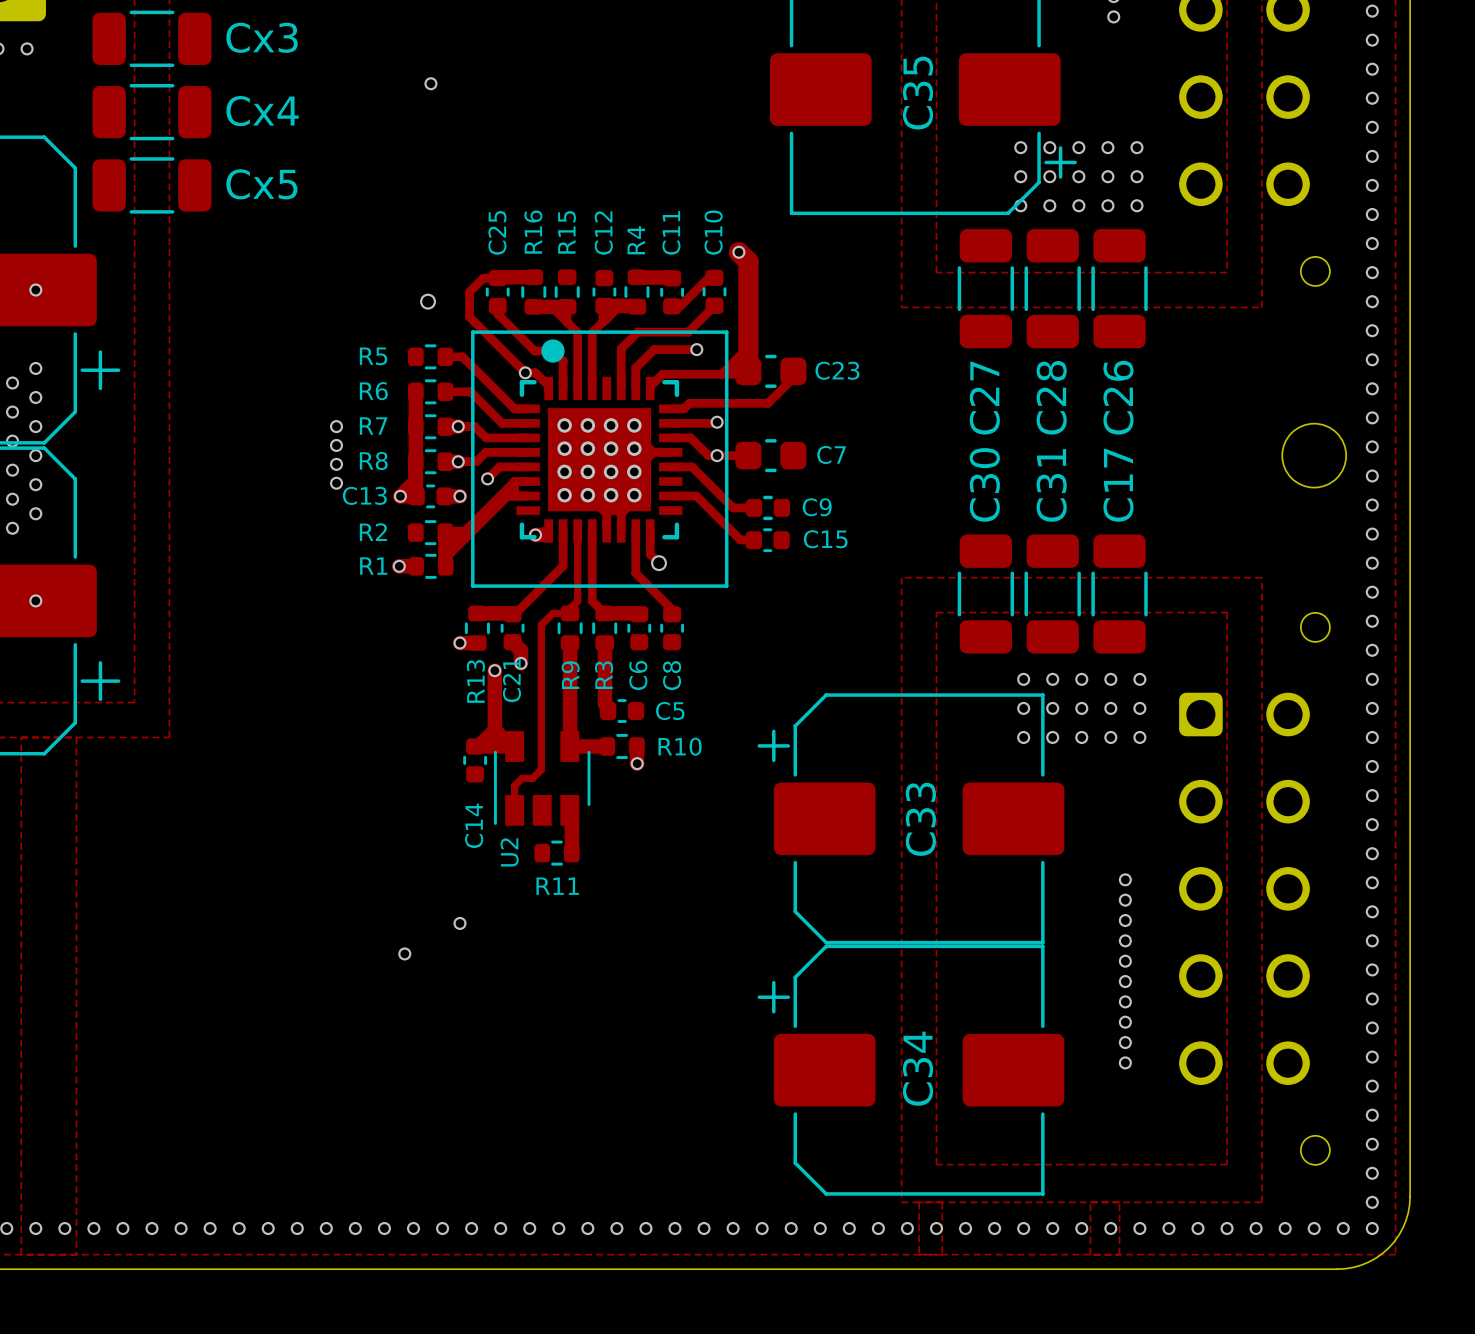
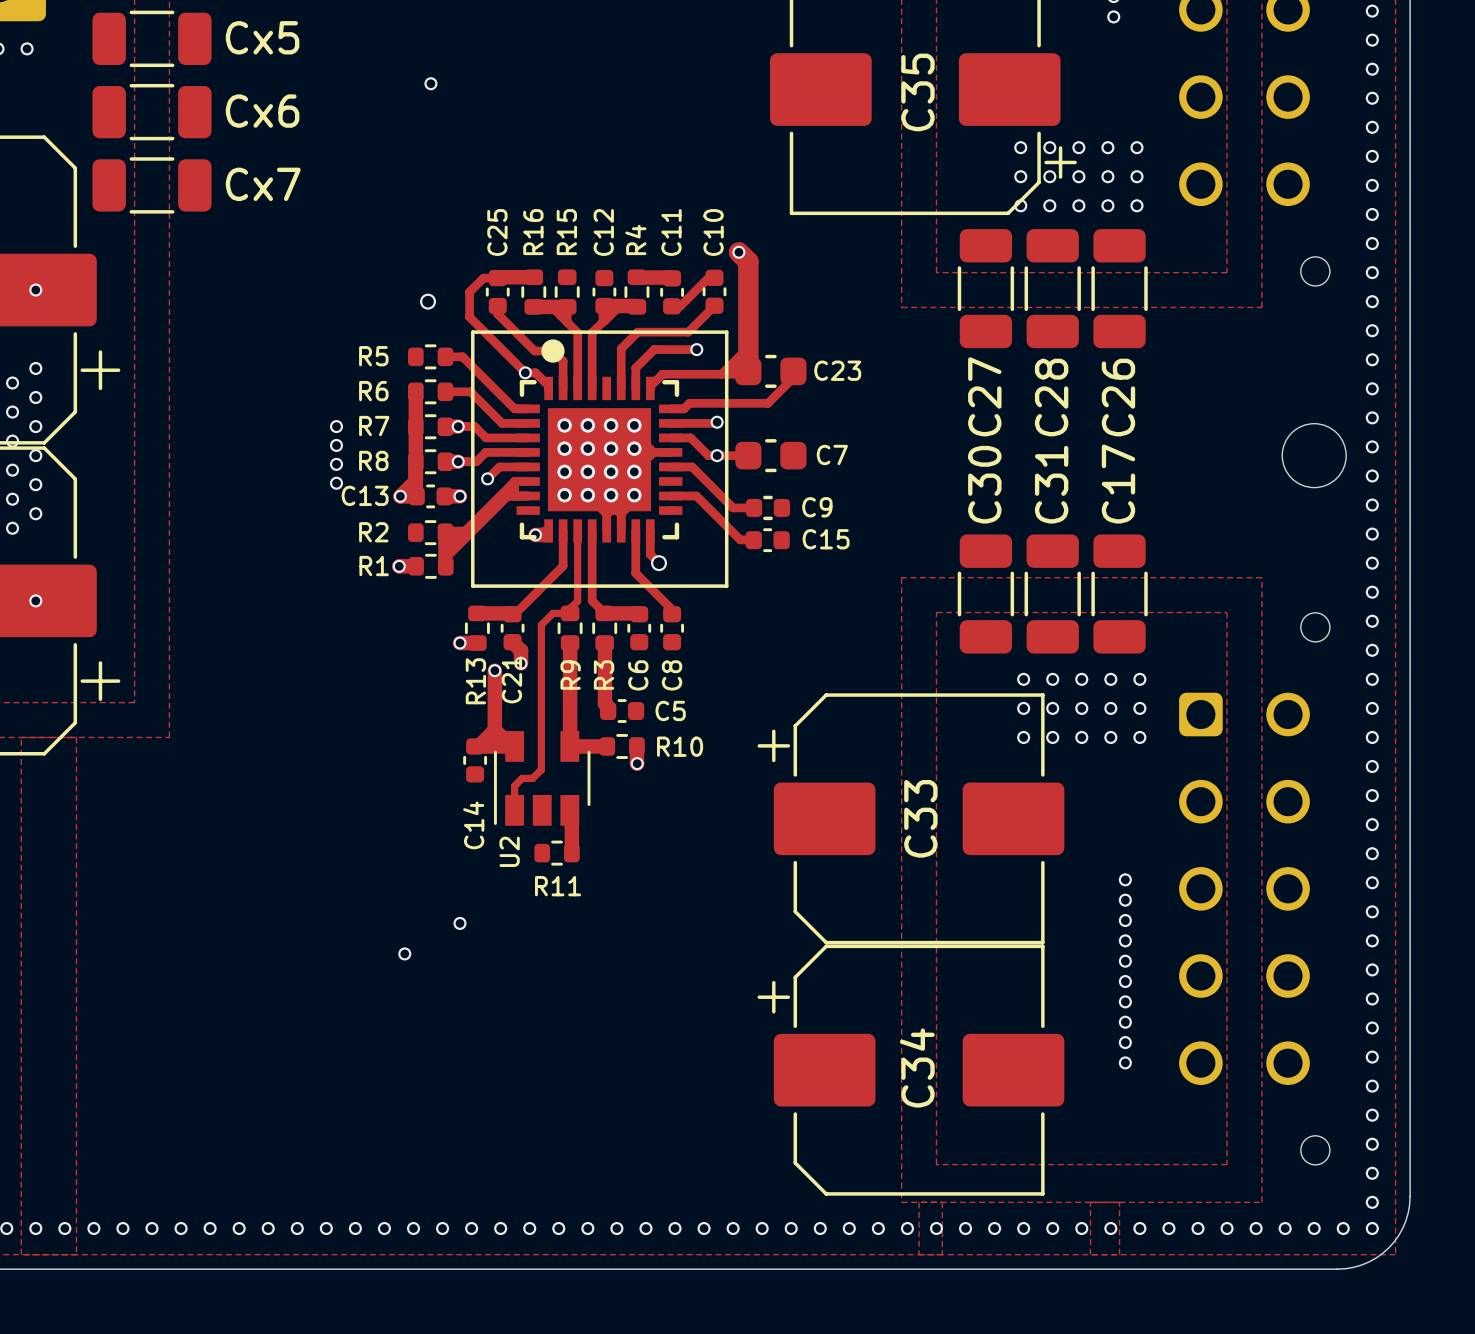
Cx3 name: Cx3 (262, 37) -> Cx5 (262, 37)
Cx4 name: Cx4 (262, 111) -> Cx6 (262, 111)
Cx5 name: Cx5 (261, 184) -> Cx7 (263, 184)

